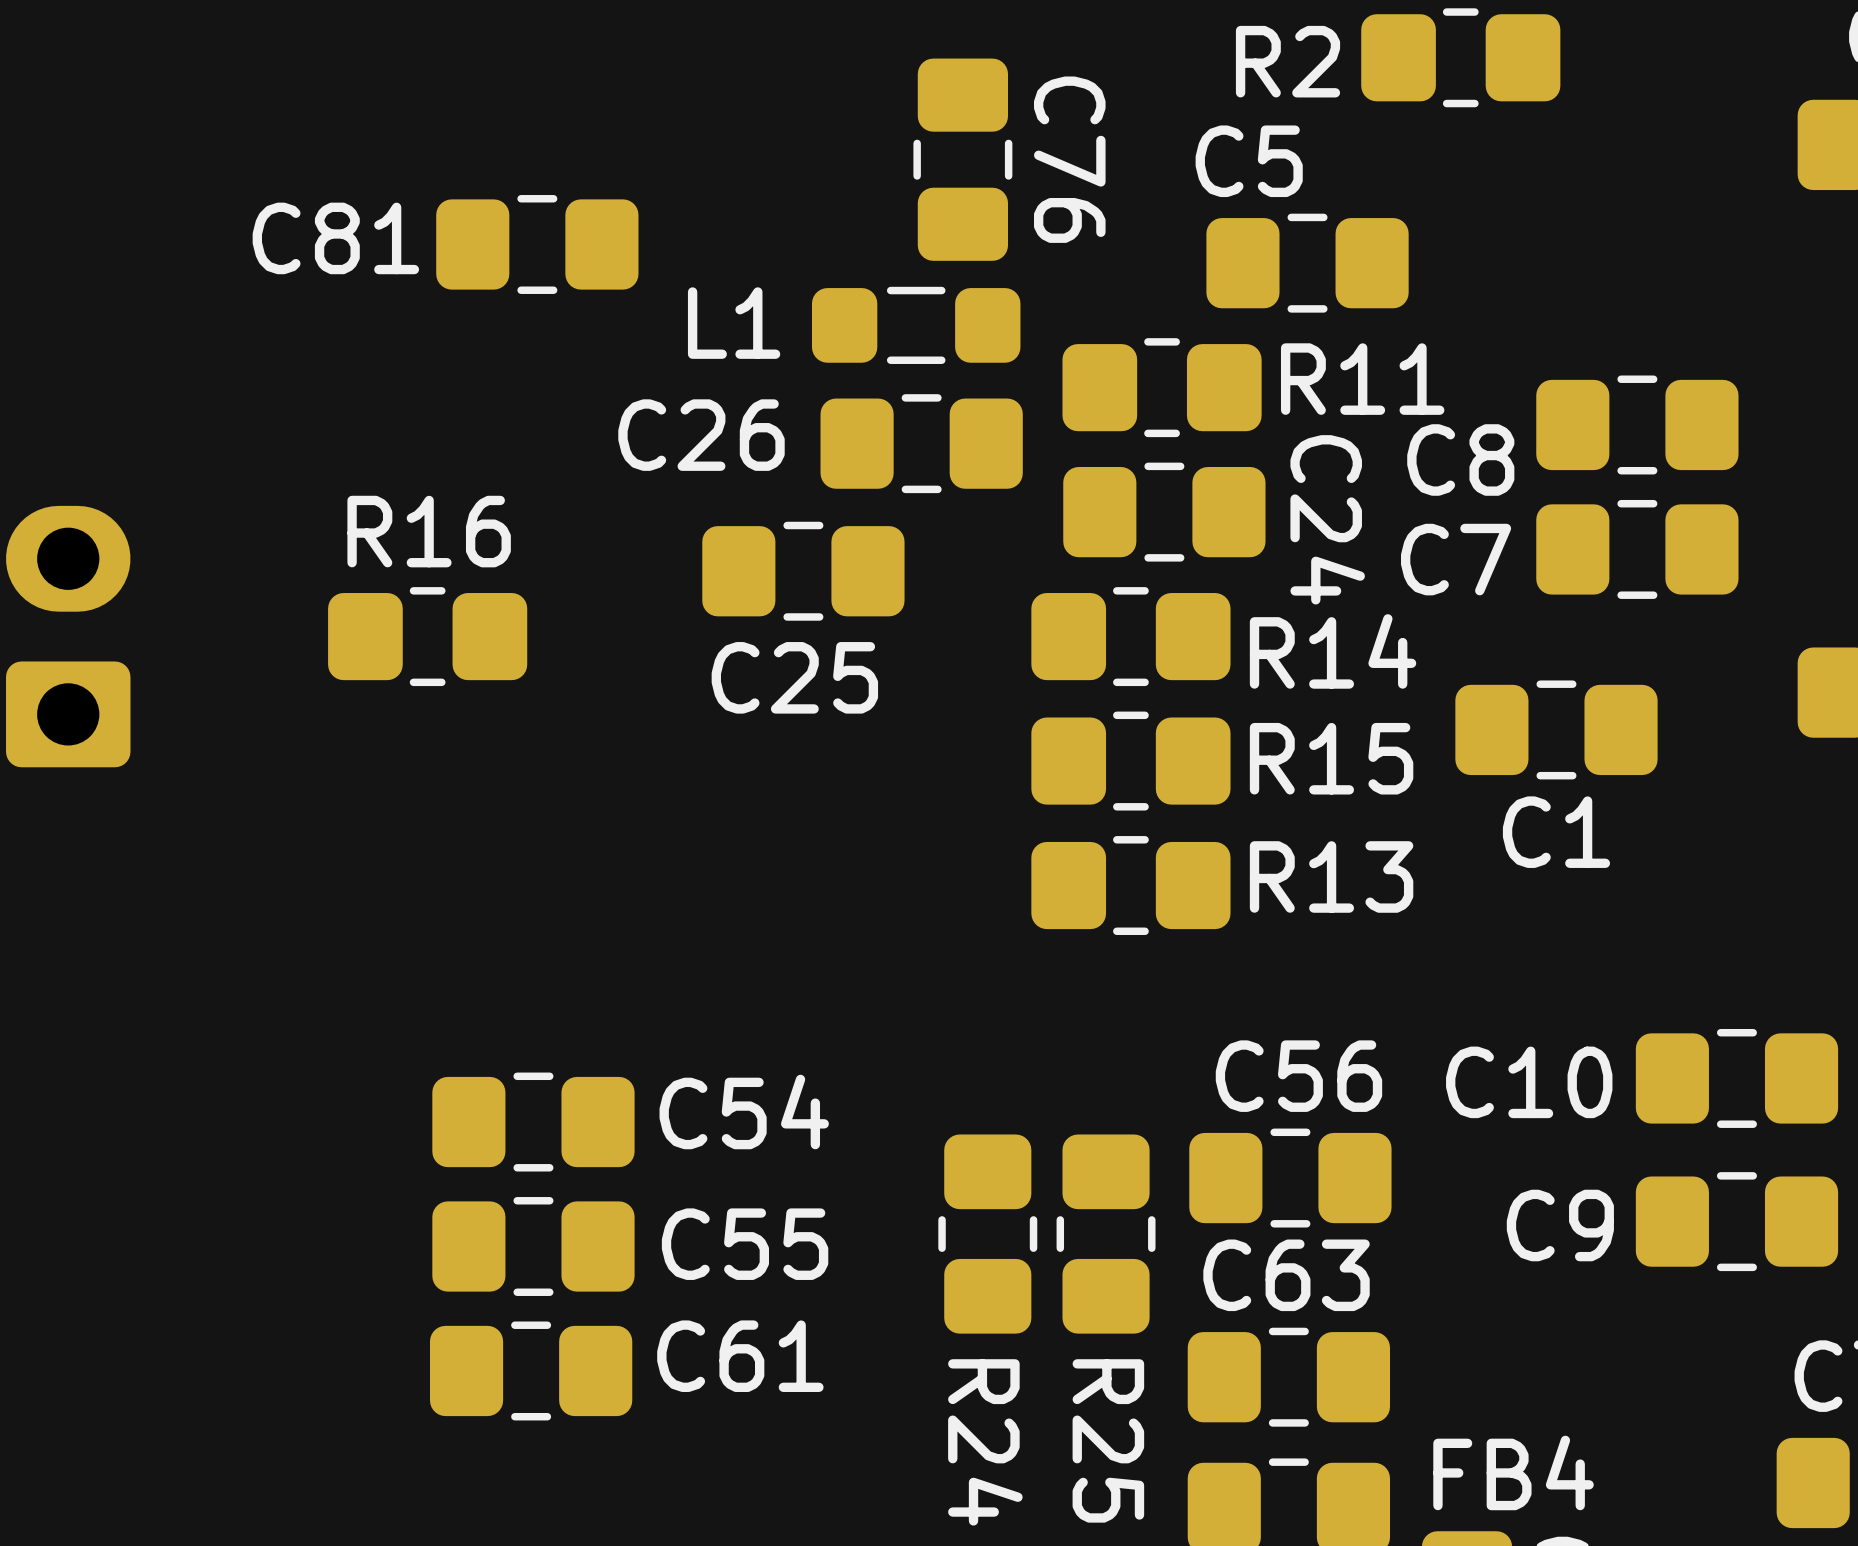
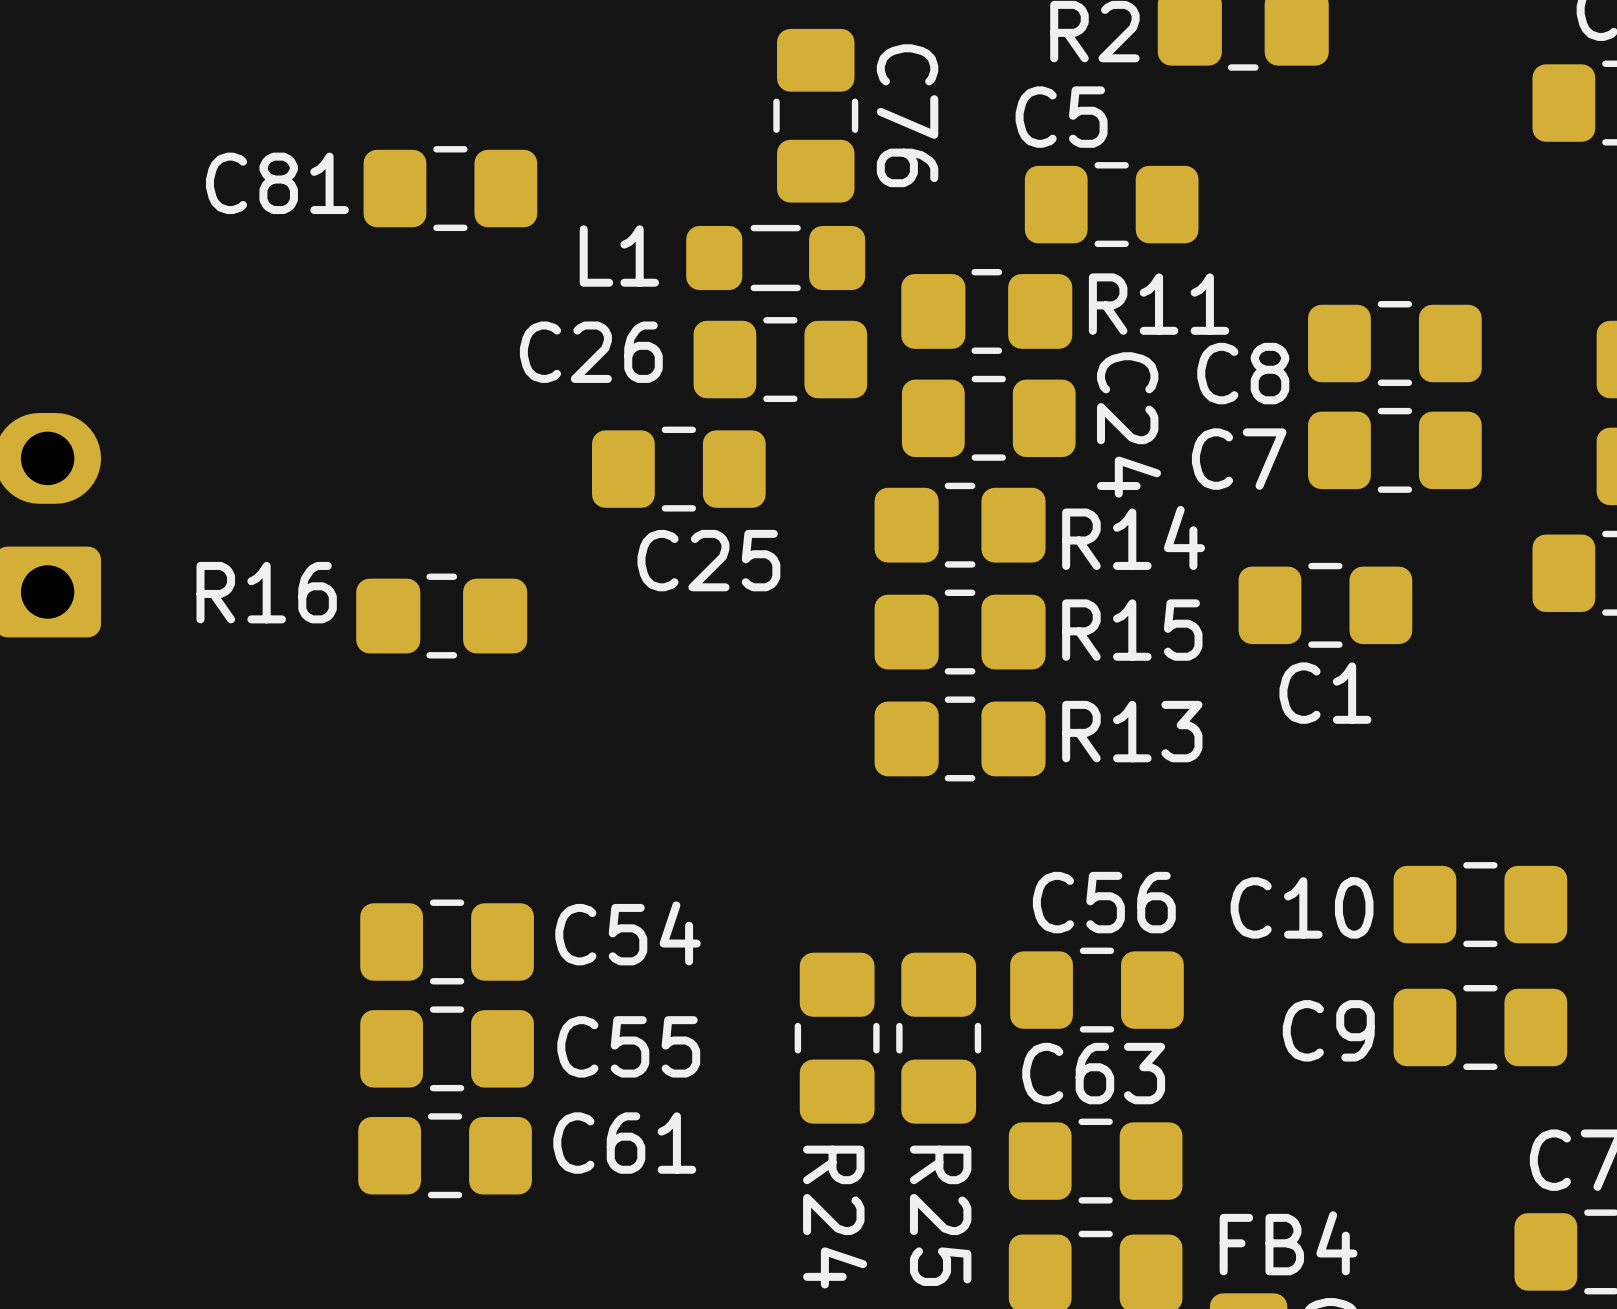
R16 name position: R16 (429, 531) -> R16 (266, 592)
R16 position: (427, 636) -> (441, 616)
C25 name position: C25 (794, 677) -> C25 (708, 560)

